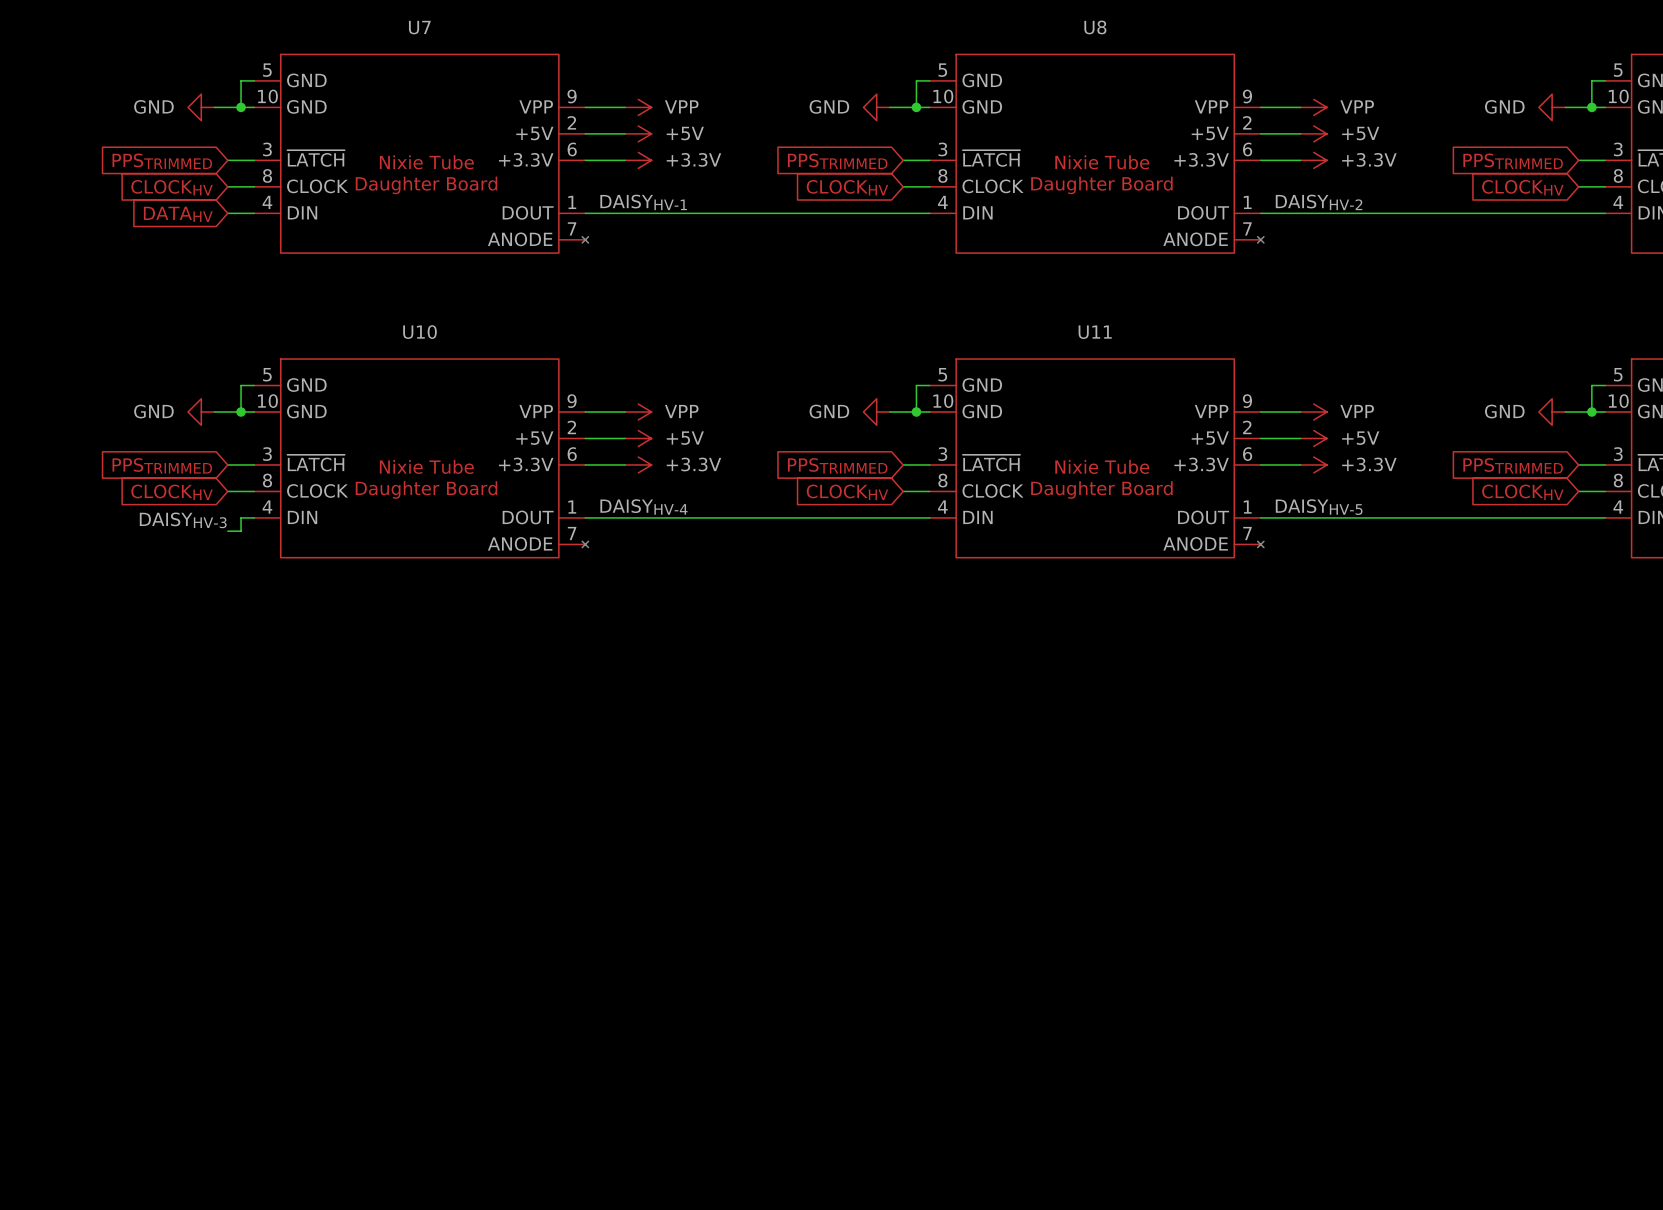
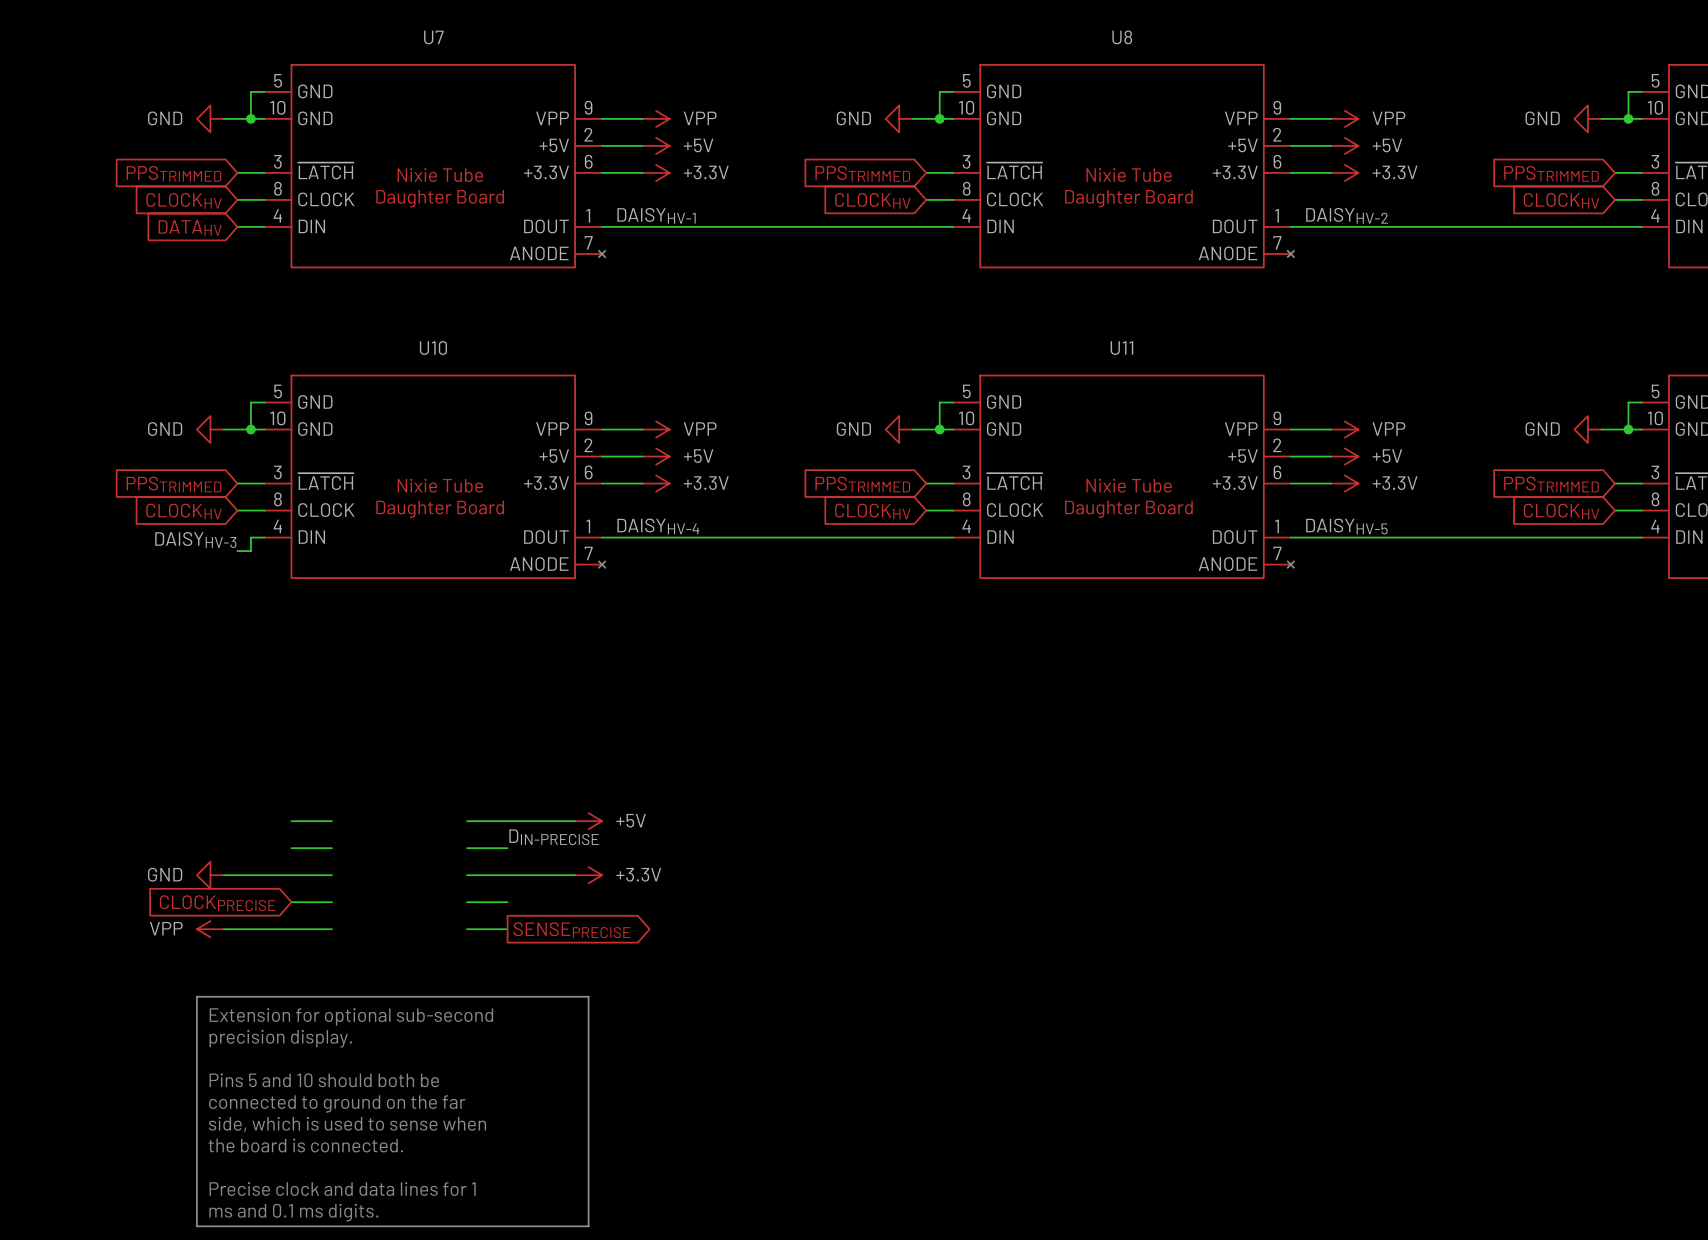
wire: none -> (291, 821) (331, 821)
wire: none -> (467, 821) (575, 821)
power symbol: none -> +5V (588, 821)
label: none -> DIN-PRECISE (554, 837)
wire: none -> (291, 848) (331, 848)
wire: none -> (467, 848) (507, 848)
power symbol: none -> GND (210, 875)
wire: none -> (223, 875) (331, 875)
wire: none -> (467, 875) (575, 875)
power symbol: none -> +3.3V (588, 875)
wire: none -> (291, 902) (331, 902)
wire: none -> (467, 902) (507, 902)
global label: none -> CLOCKPRECISE (217, 903)
power symbol: none -> VPP (210, 929)
wire: none -> (223, 929) (331, 929)
wire: none -> (467, 929) (507, 929)
global label: none -> SENSEPRECISE (571, 930)
line: none -> (196, 996) (588, 996) (588, 1226) (196, 1226) (196, 996)
text: none -> Extension for optional sub-second (351, 1016)
text: none -> precision display. (280, 1038)
text: none -> Pins 5 and 10 should both be (324, 1080)
text: none -> connected to ground on the far (337, 1103)
text: none -> side, which is used to sense when (347, 1124)
text: none -> the board is connected. (305, 1145)
text: none -> Precise clock and data lines for 1 (342, 1189)
text: none -> ms and 0.1 ms digits. (293, 1212)

